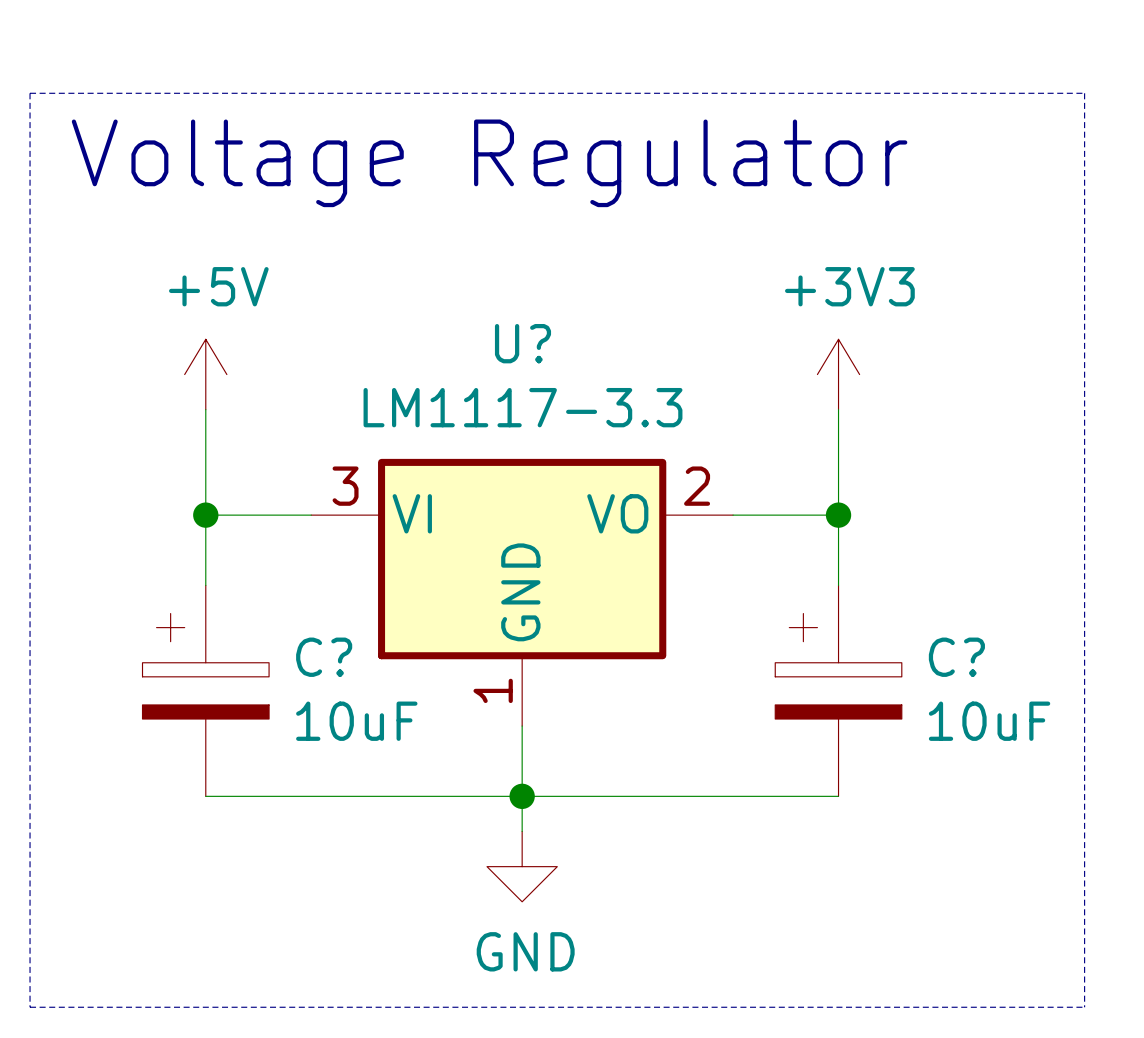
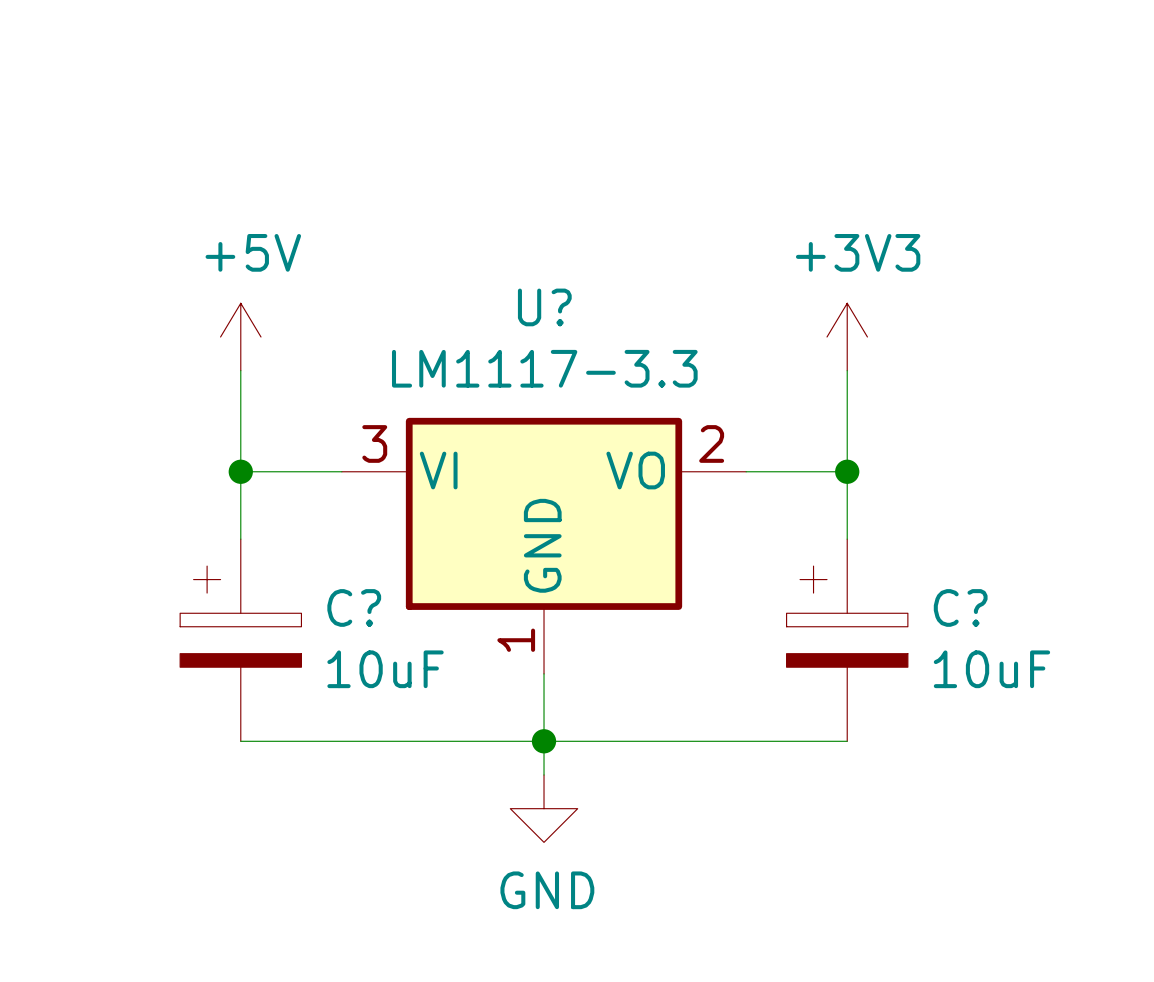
line: (30, 93) (30, 1007) (1084, 1007) (1084, 93) (30, 93) -> none
text: Voltage Regulator (489, 163) -> none

